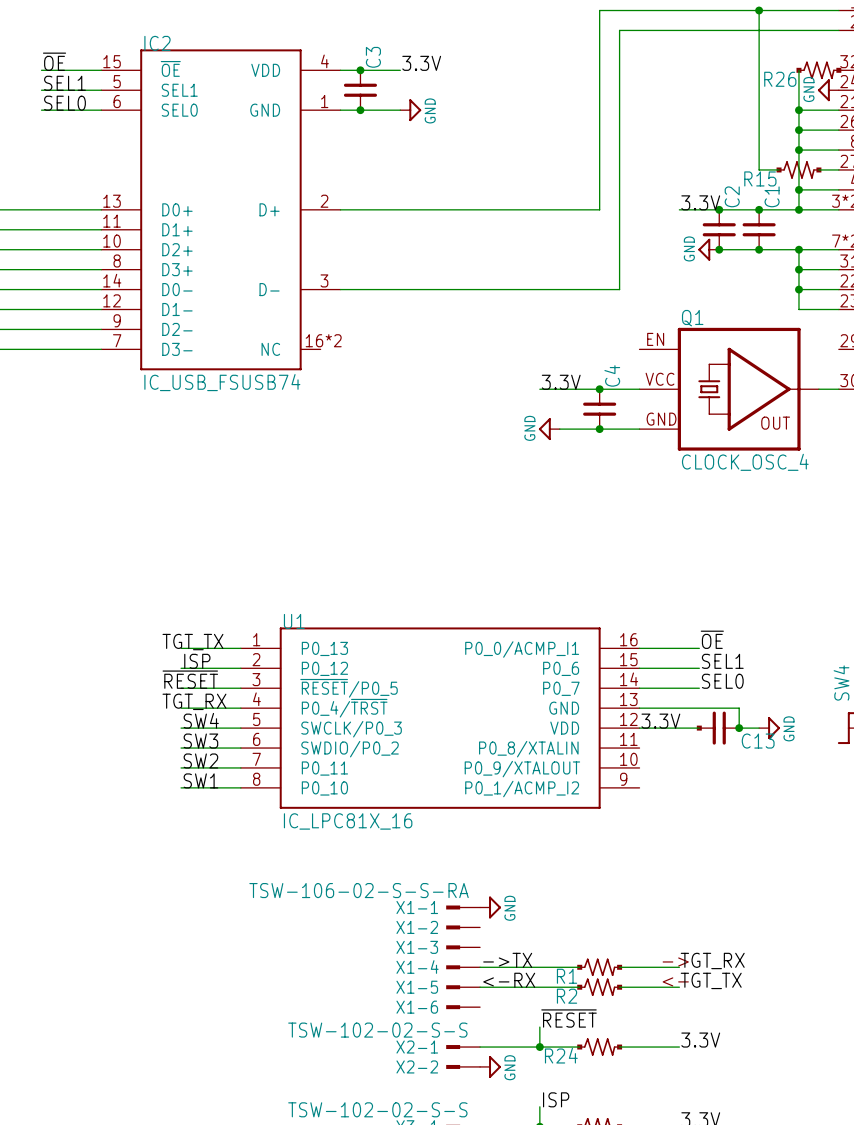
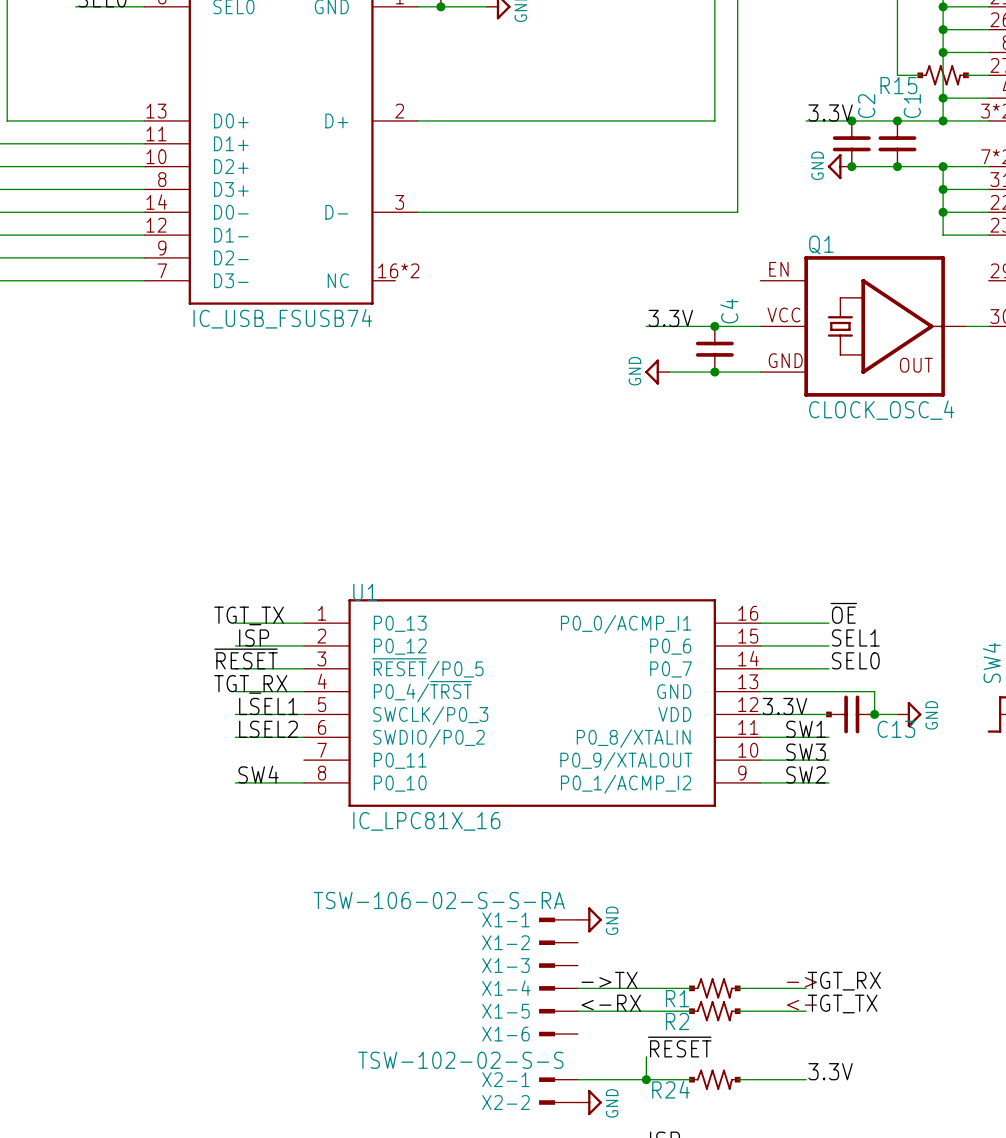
label: SW4 (201, 720) -> LSEL1 (268, 706)
label: SW3 (200, 741) -> LSEL2 (268, 729)
label: none -> SW1 (806, 729)
wire: none -> (760, 737) (828, 737)
label: SW2 (200, 760) -> none
label: none -> SW3 (806, 752)
wire: (181, 767) (240, 767) -> none
wire: none -> (760, 760) (828, 760)
label: SW1 (200, 780) -> SW4 (258, 774)
label: none -> SW2 (806, 774)
wire: none -> (760, 782) (828, 782)

